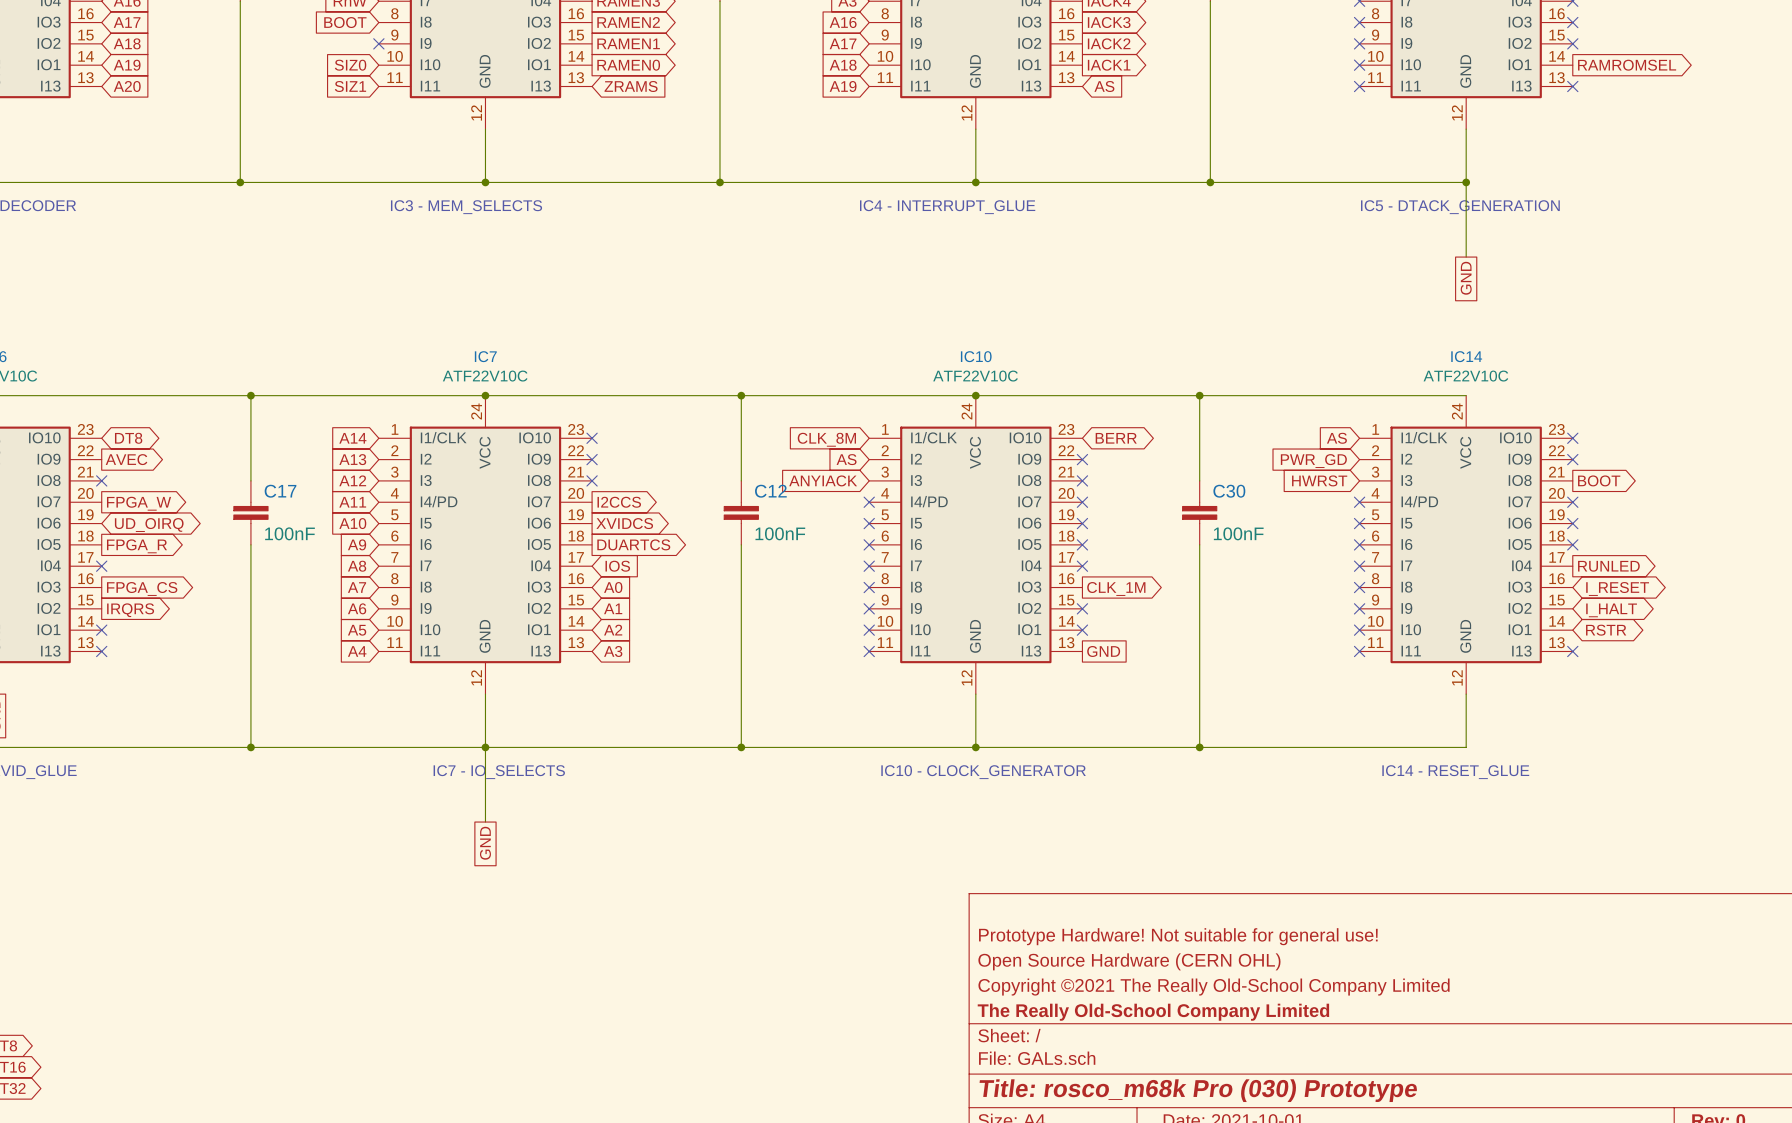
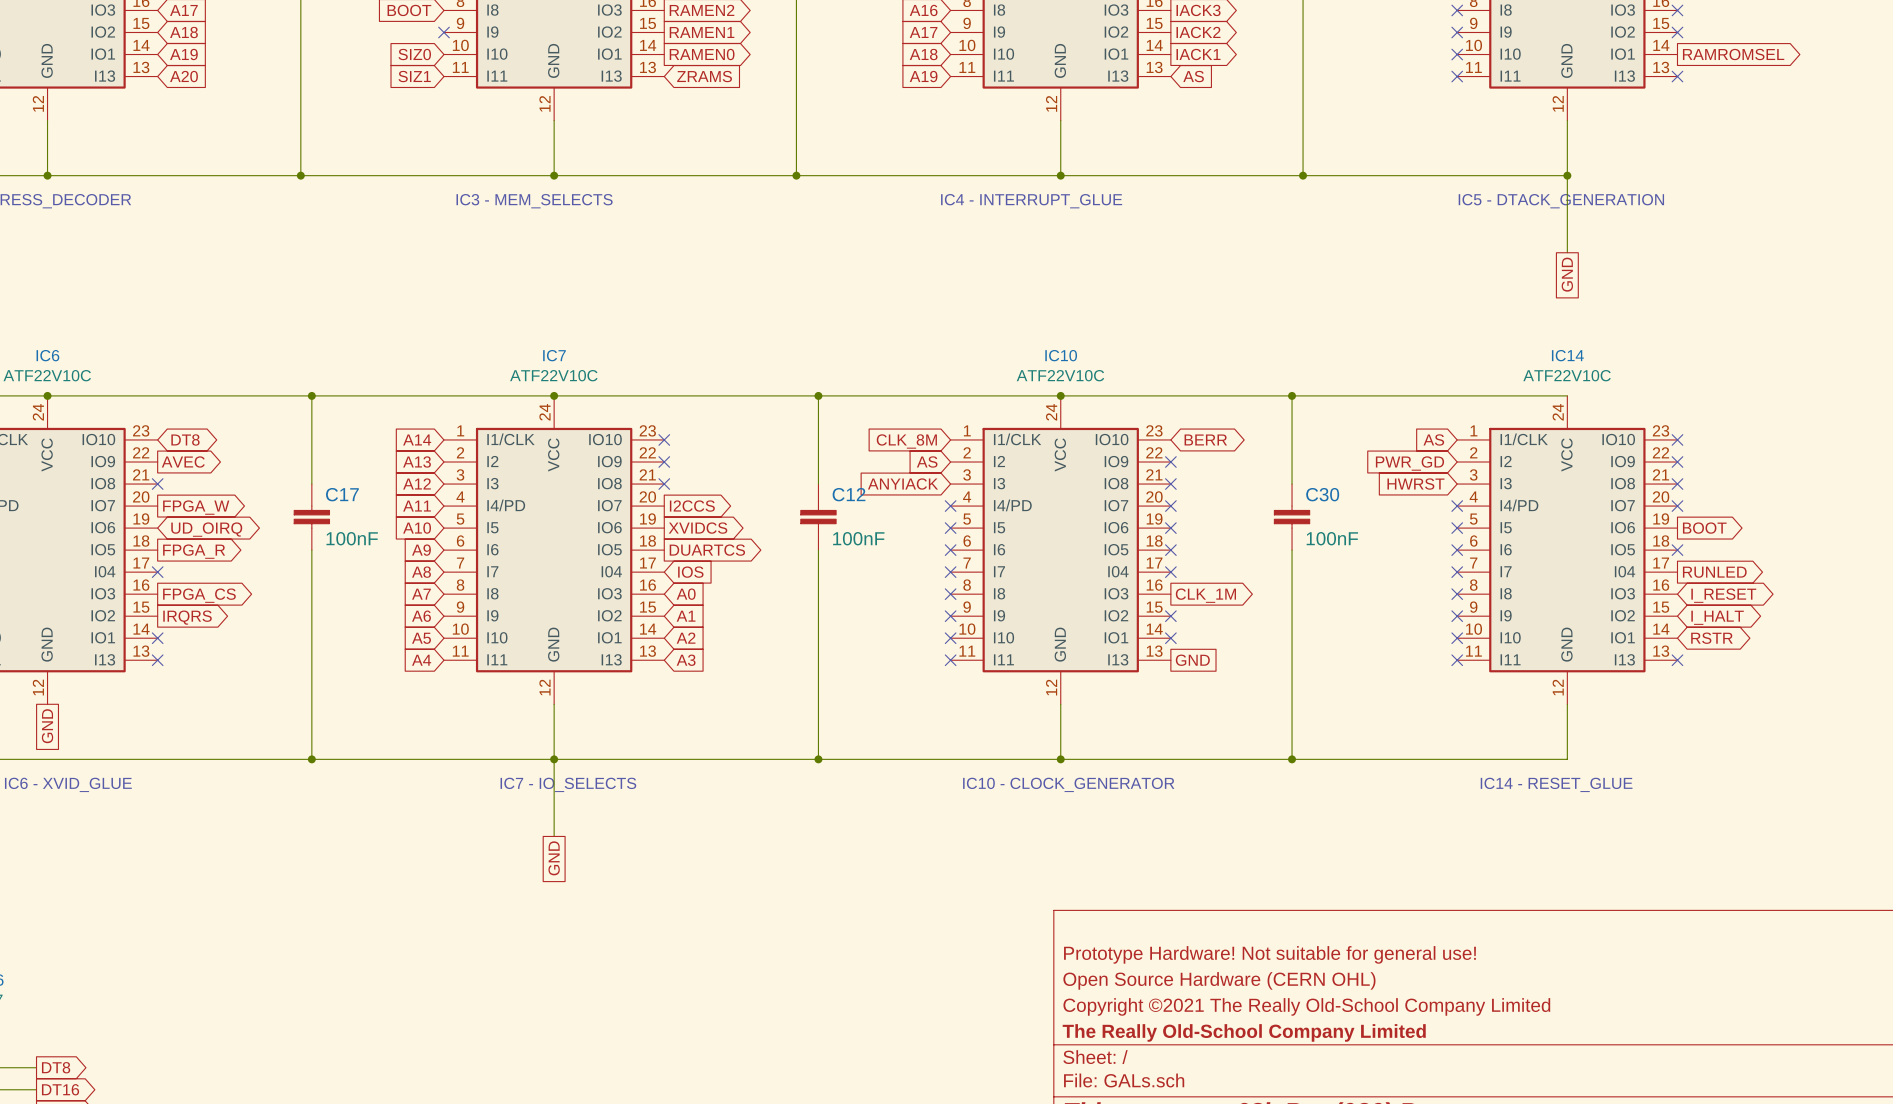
global label position: BOOT (1599, 480) -> BOOT (1704, 528)
no-connect mark position: (1572, 523) -> (1677, 484)

